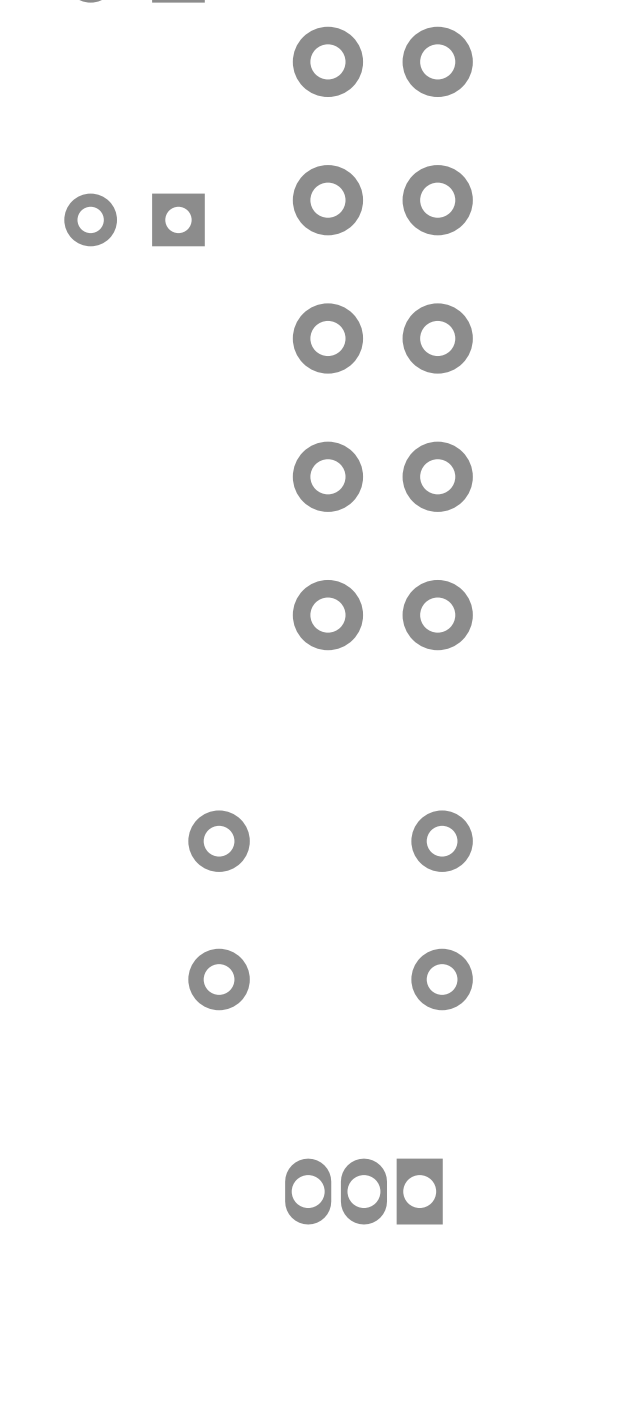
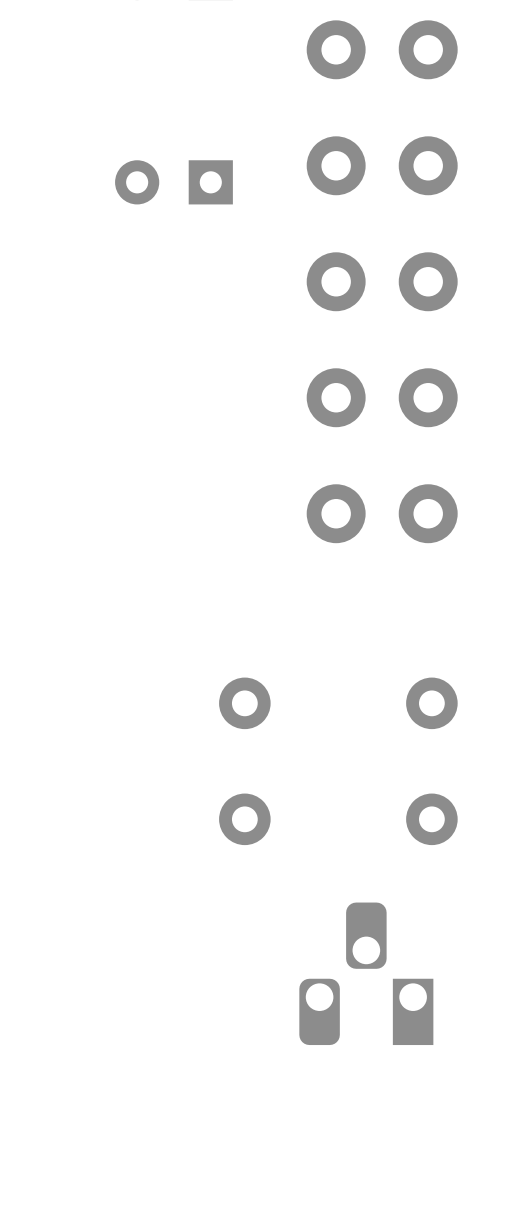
part footprint: [285, 1158, 443, 1225] -> [299, 902, 434, 1046]

